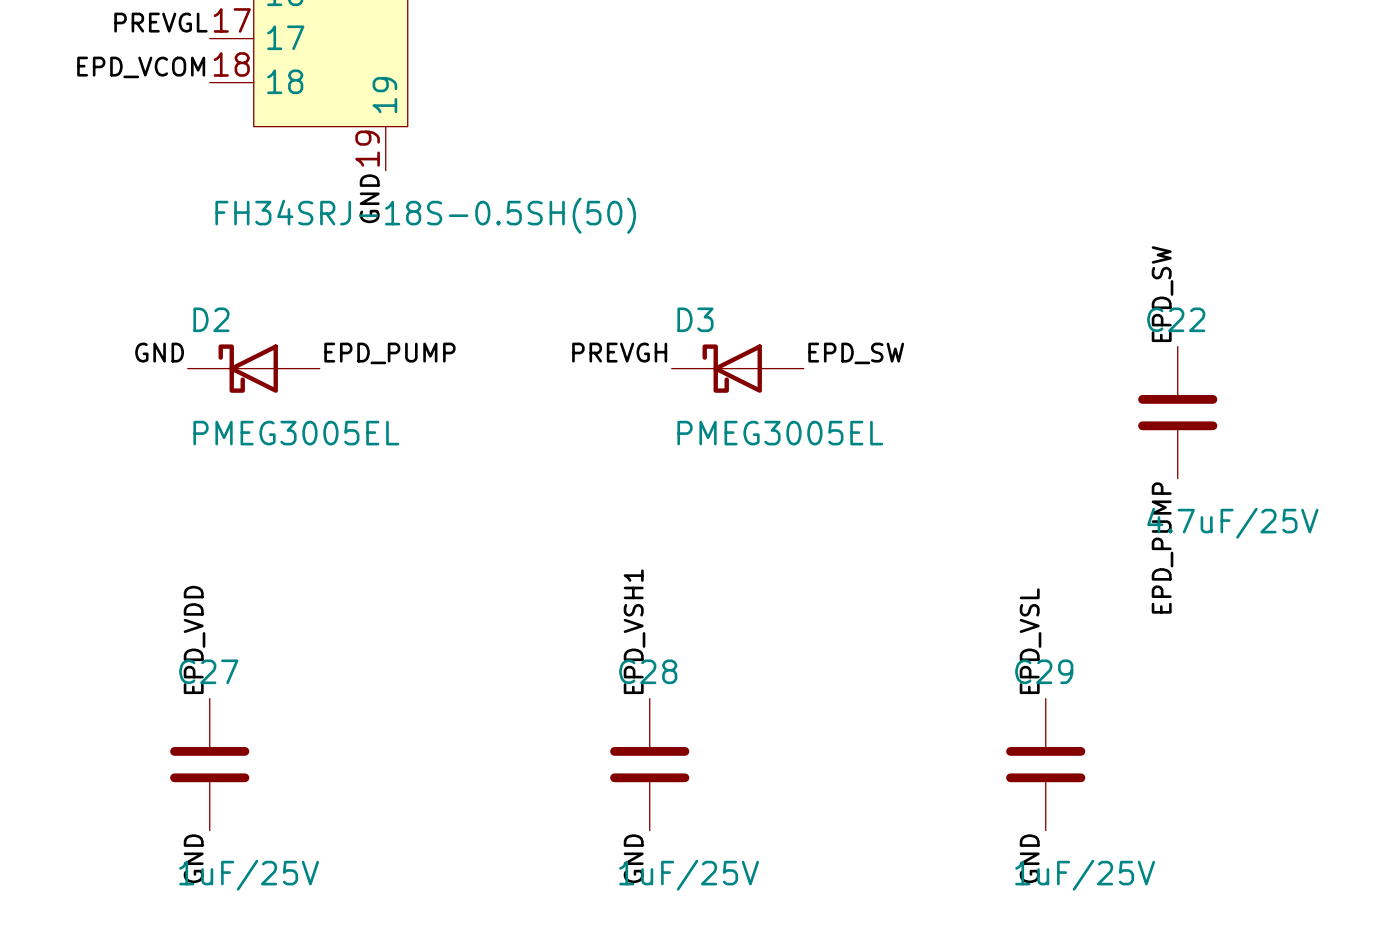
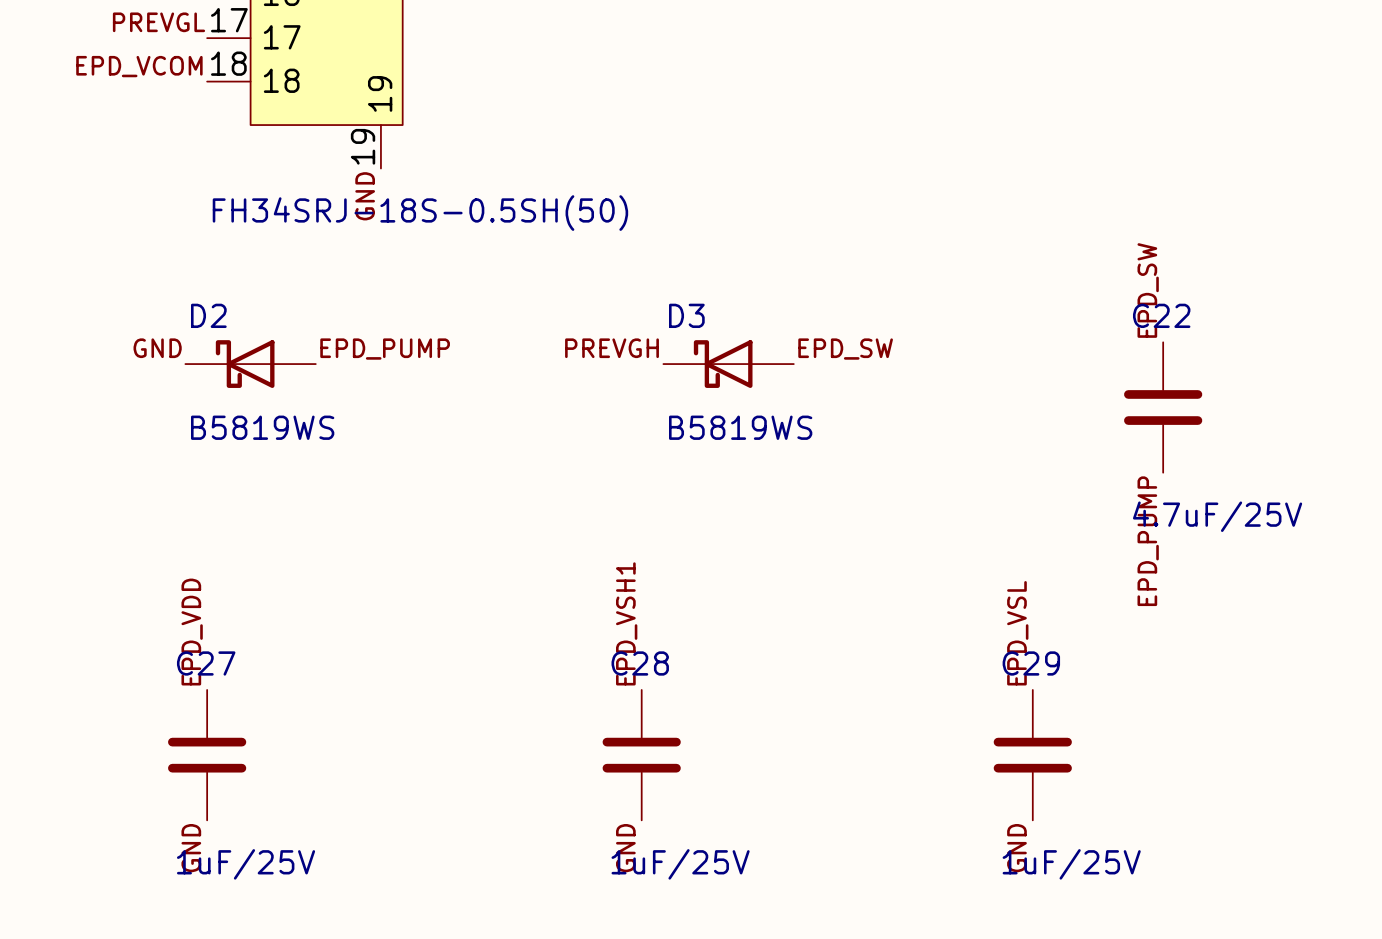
D2 value: PMEG3005EL (296, 433) -> B5819WS (262, 427)
D3 value: PMEG3005EL (780, 433) -> B5819WS (740, 427)

